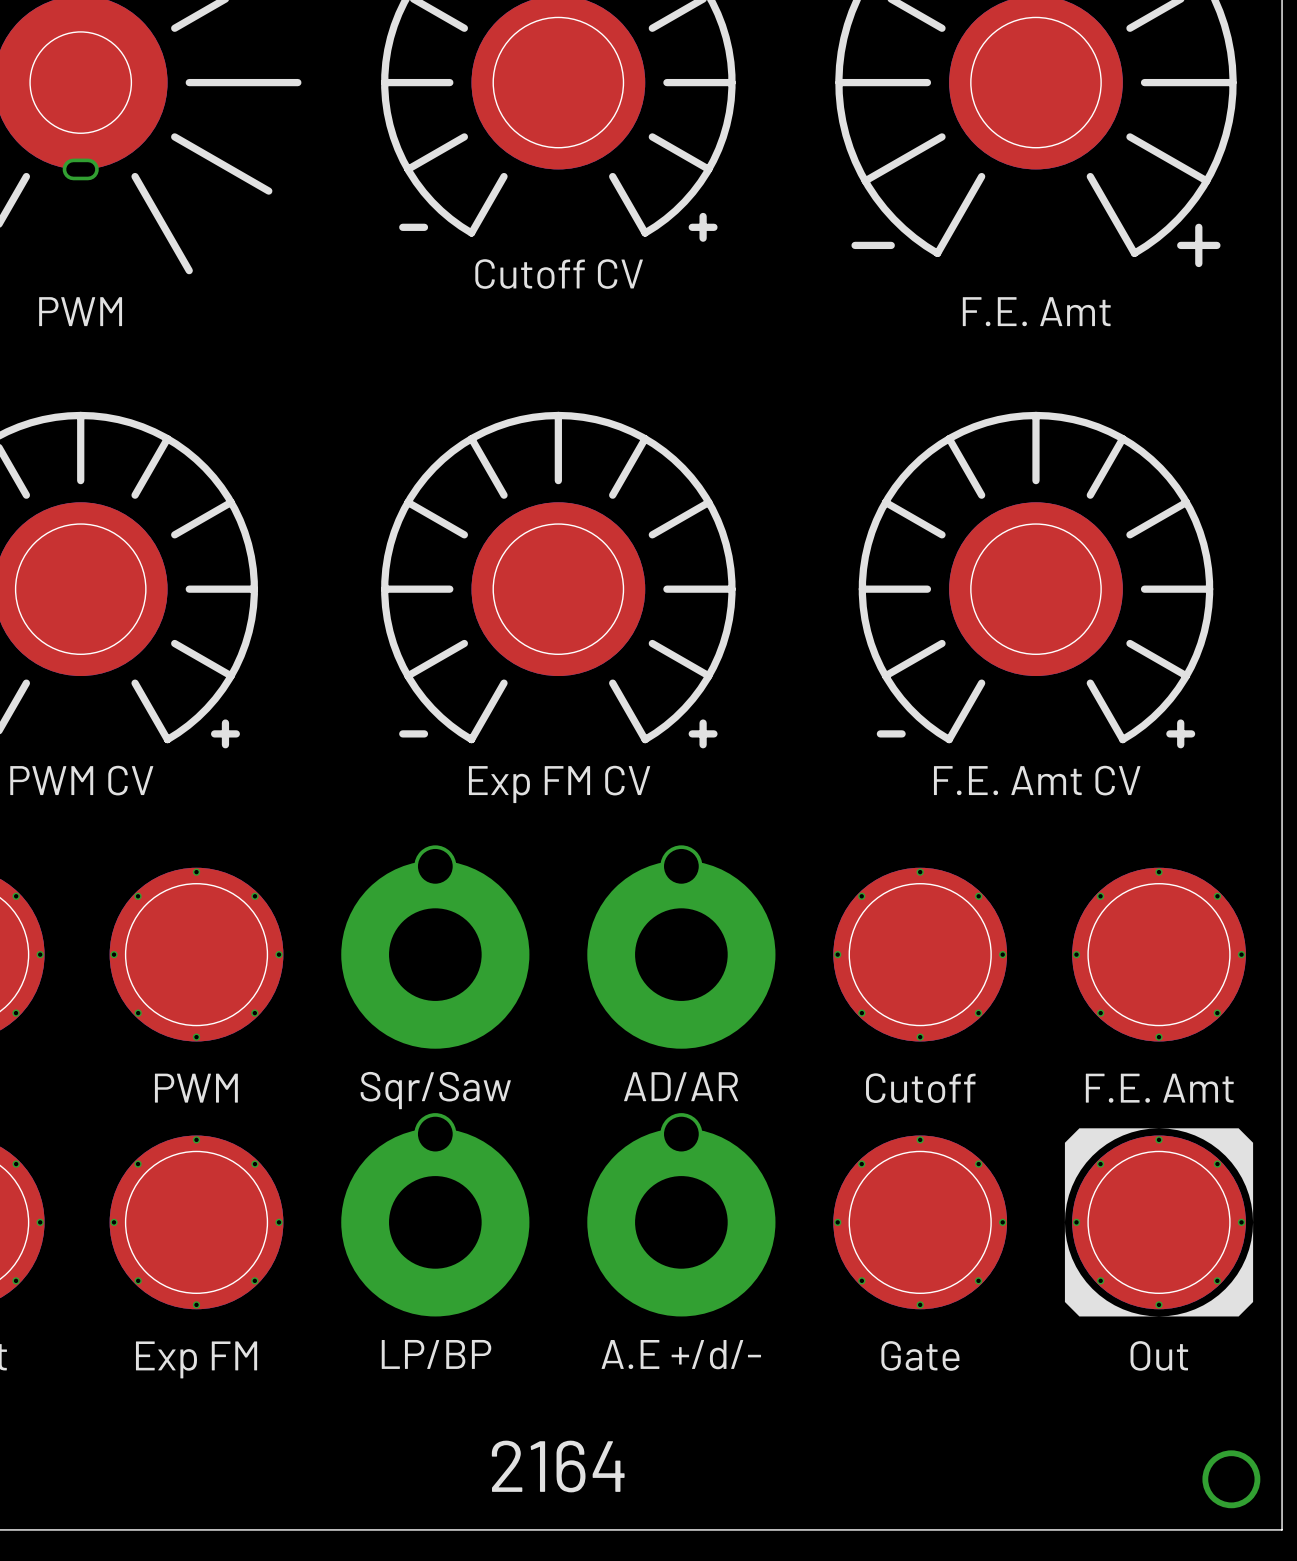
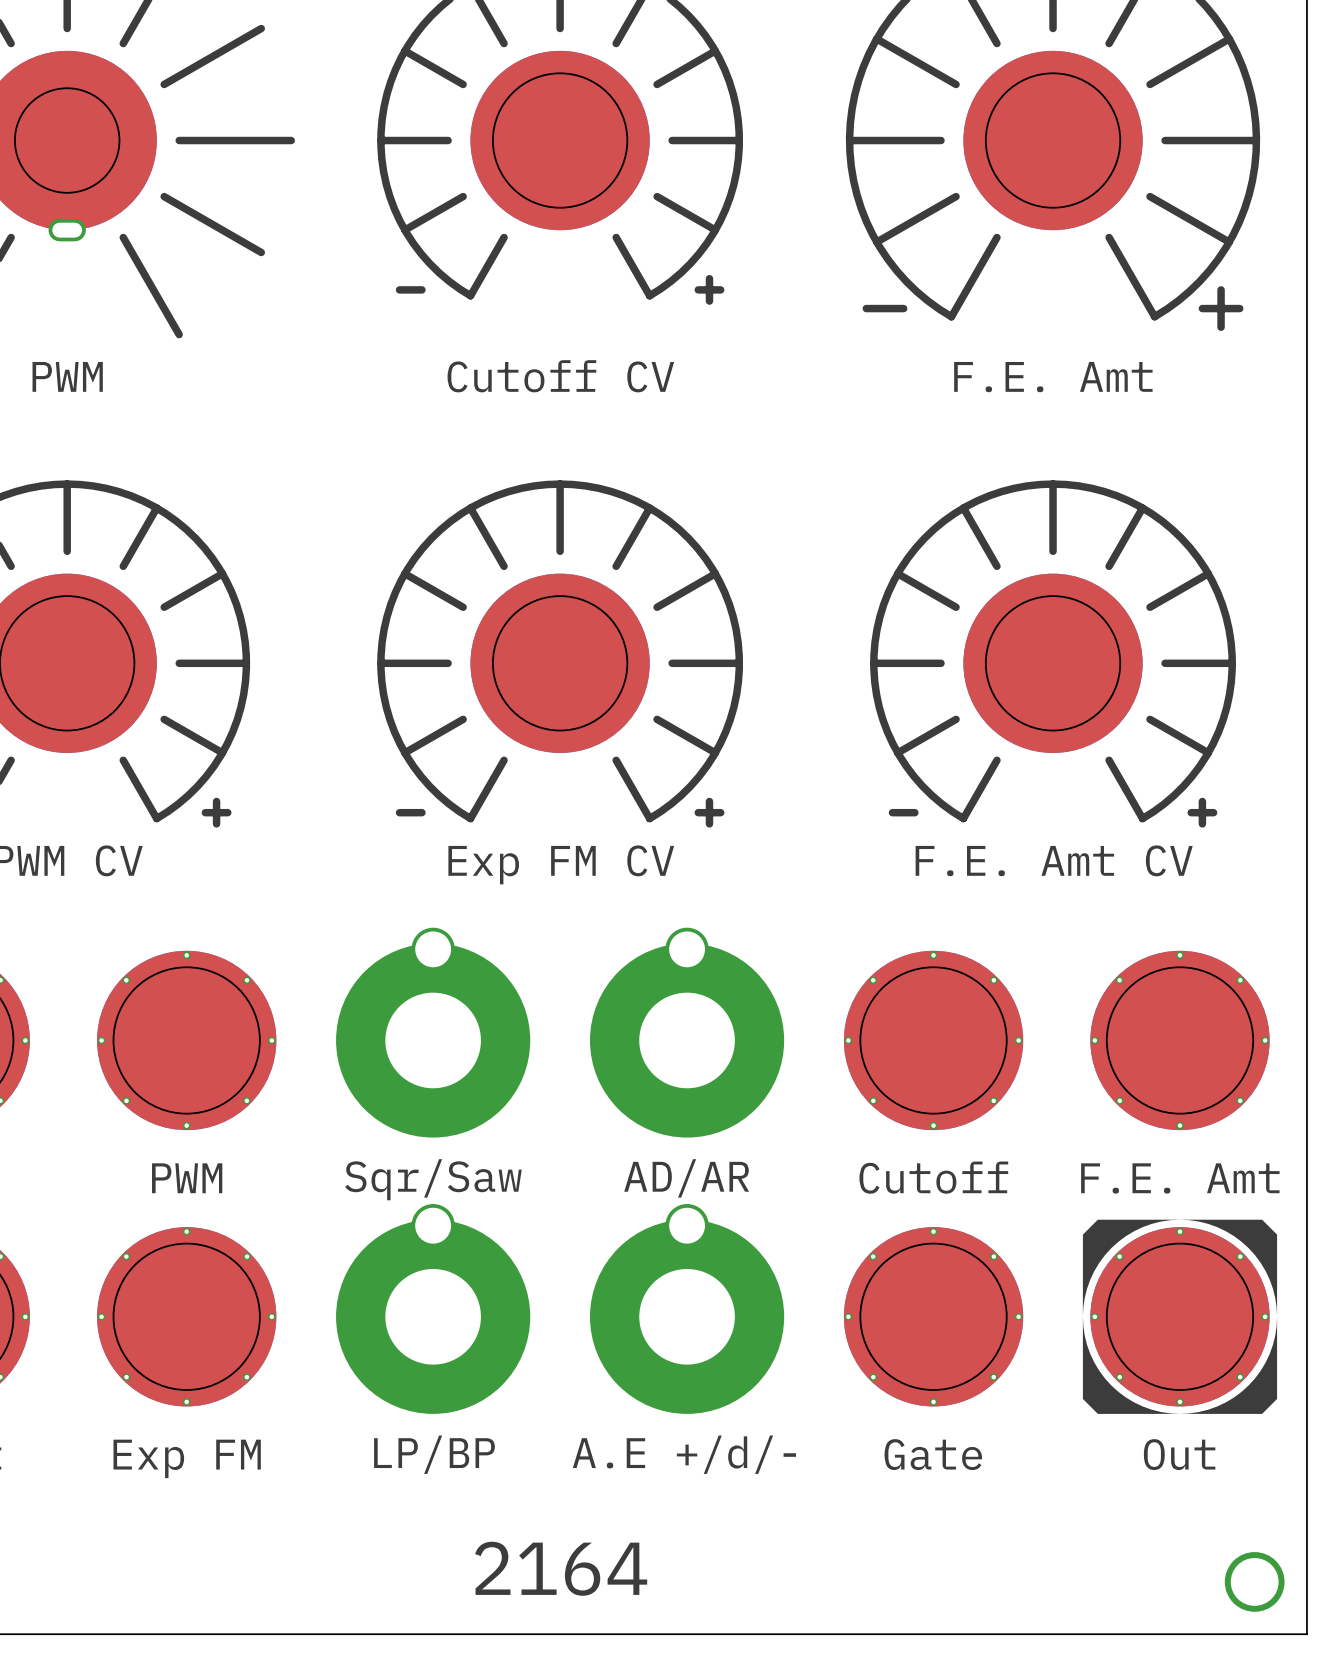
part value position: Cutoff CV (559, 274) -> Cutoff CV (560, 376)

